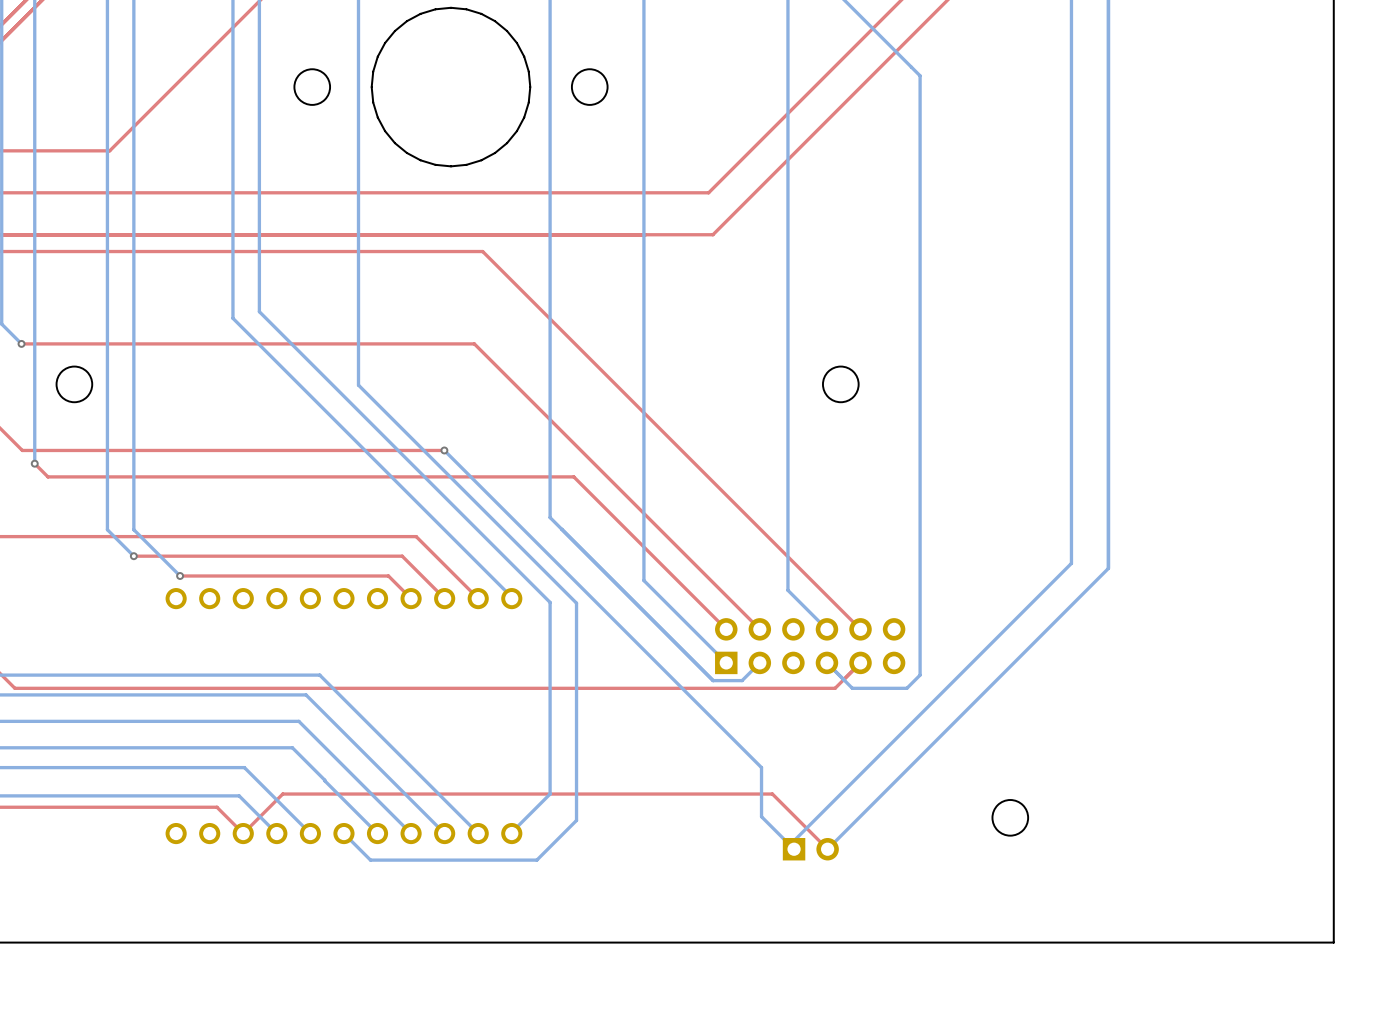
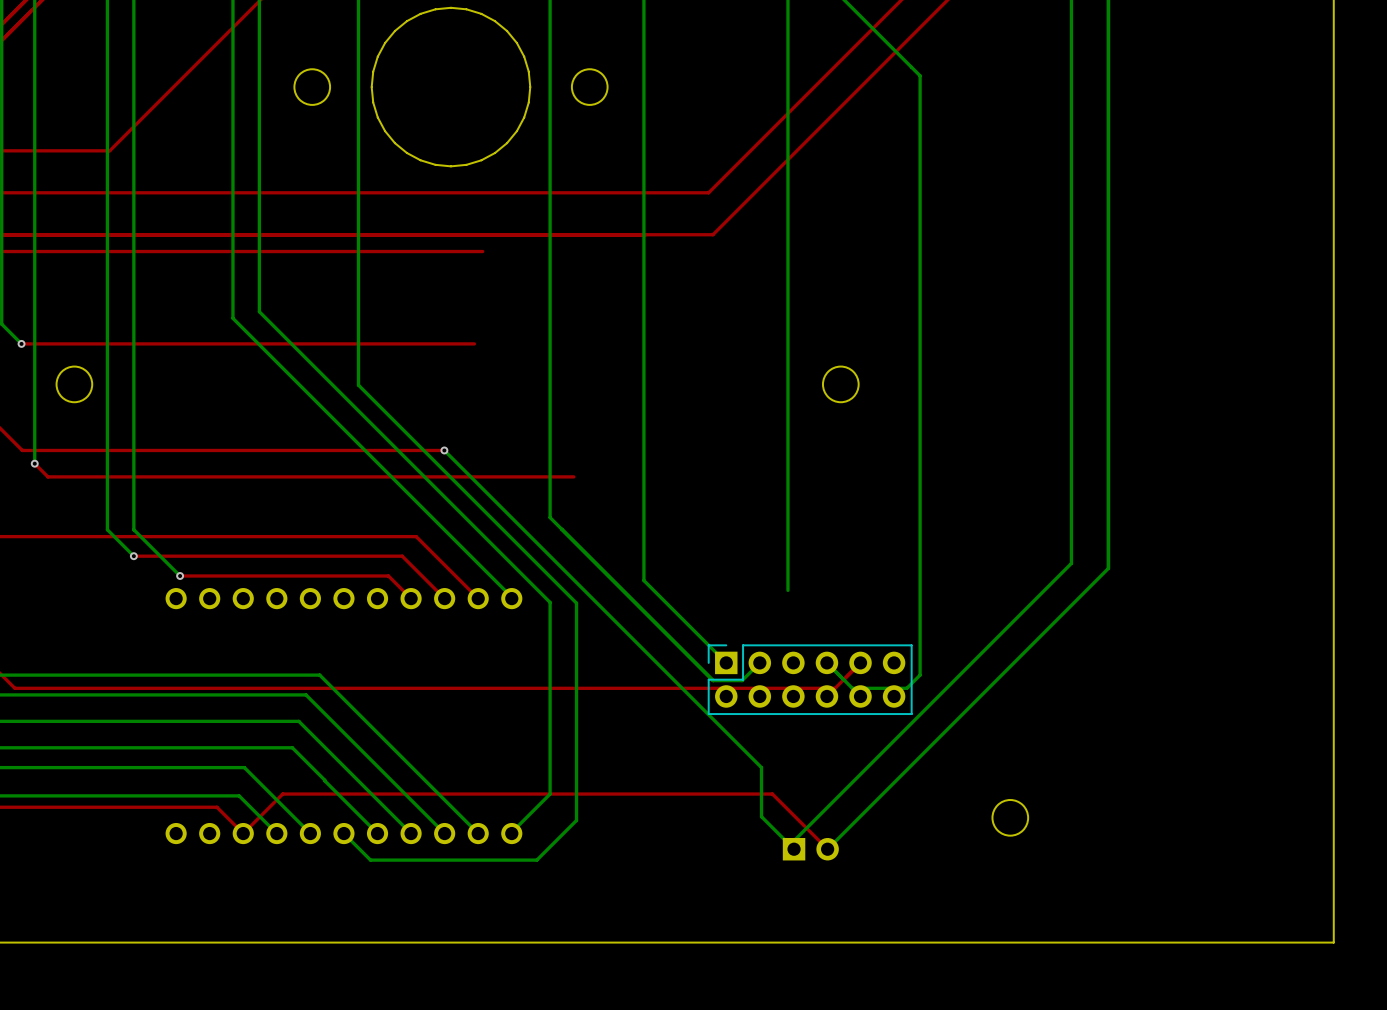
top track: (482, 251) (860, 629) -> none
top track: (474, 343) (759, 629) -> none
top track: (573, 476) (726, 629) -> none
bottom track: (787, 590) (826, 629) -> none
part side: top (810, 646) -> bottom (810, 679)

